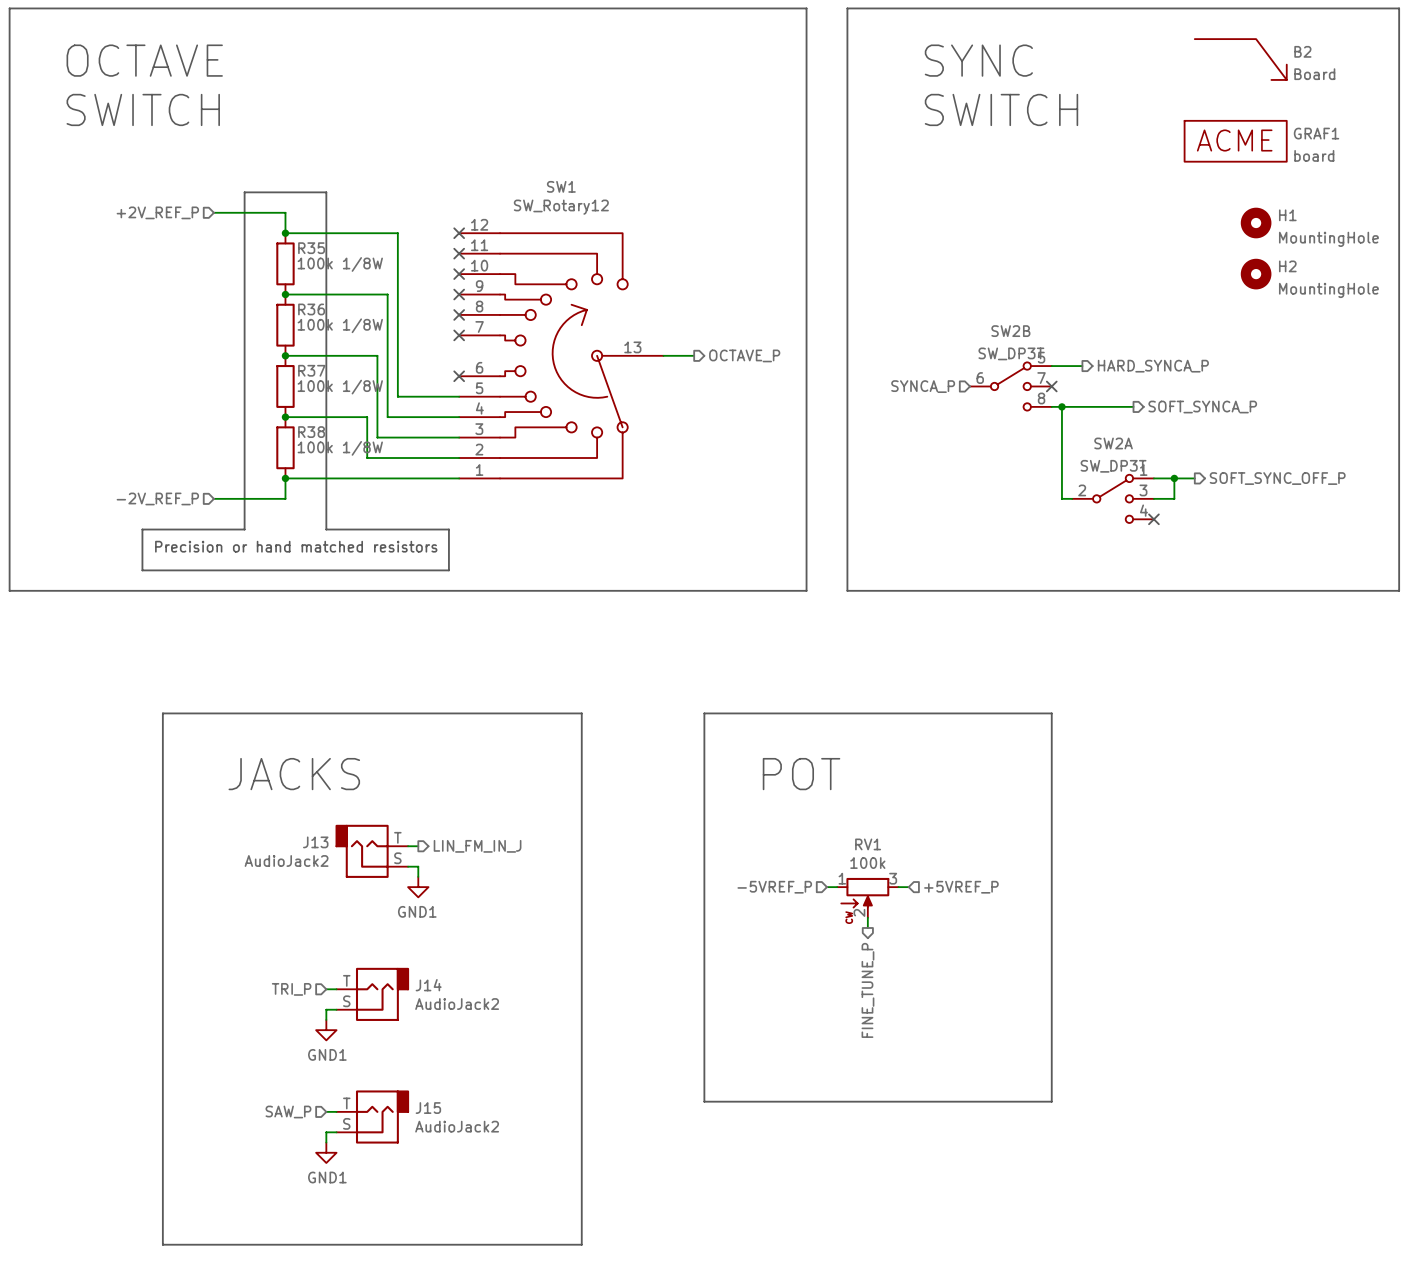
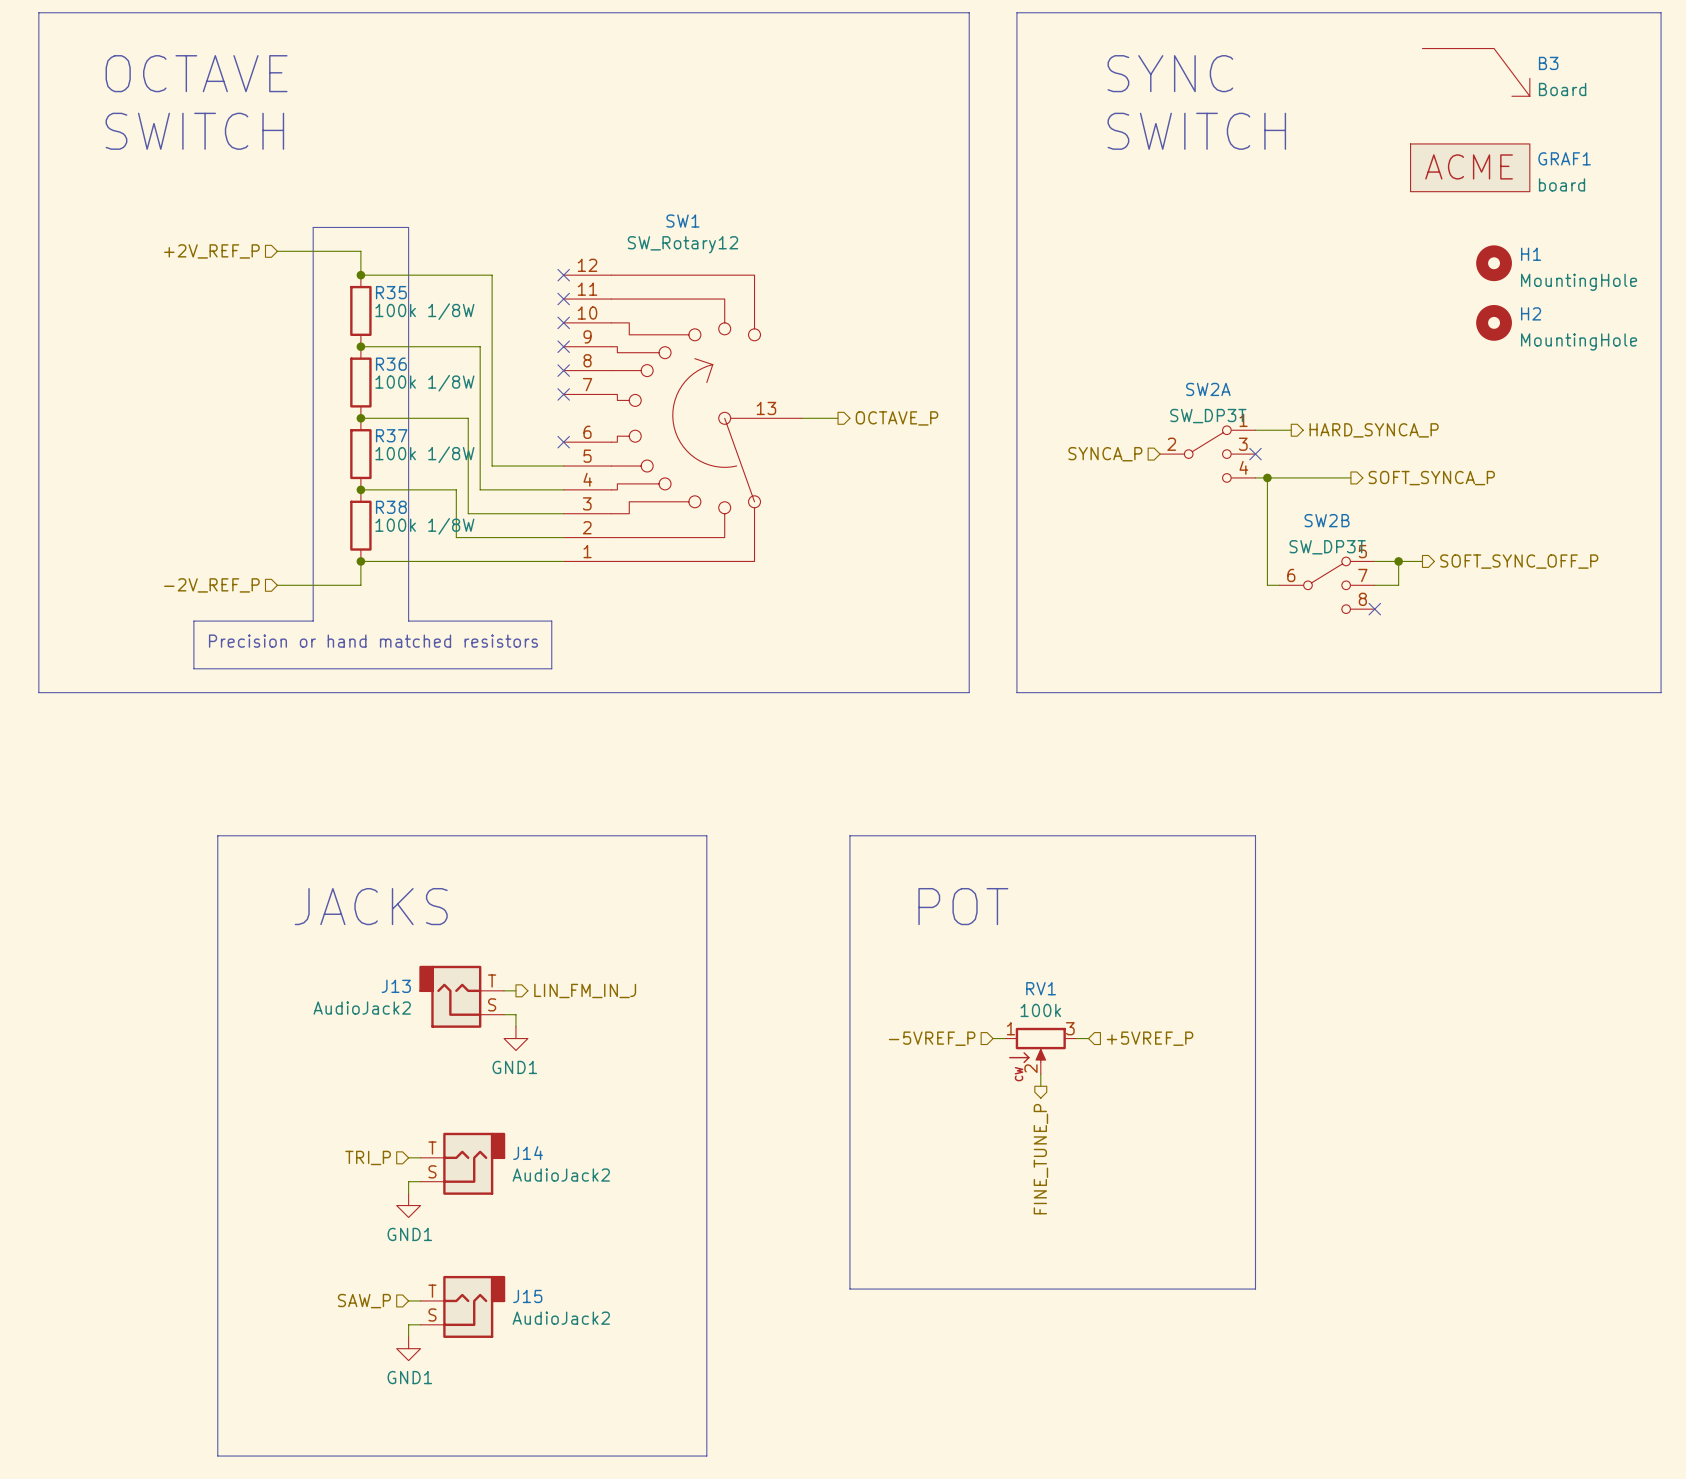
B2 name: B2 (1302, 51) -> B3 (1548, 63)
SW2B position: (1010, 386) -> (1327, 585)
SW2A position: (1113, 498) -> (1207, 454)

